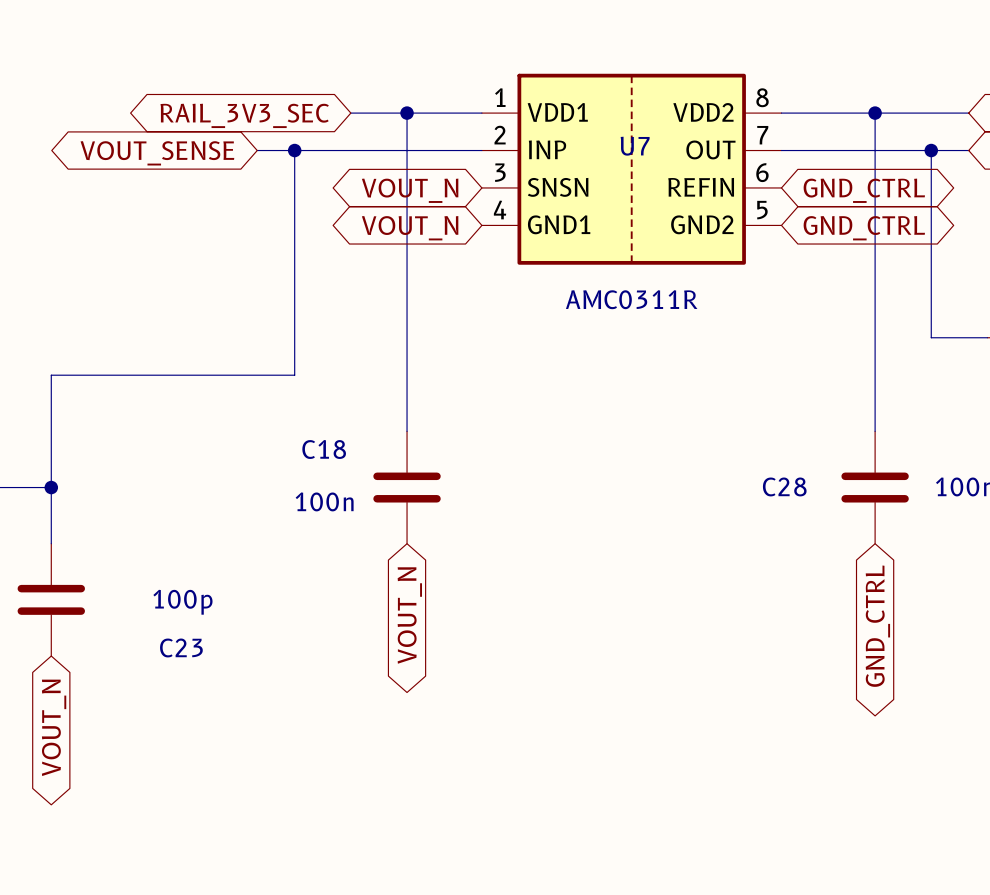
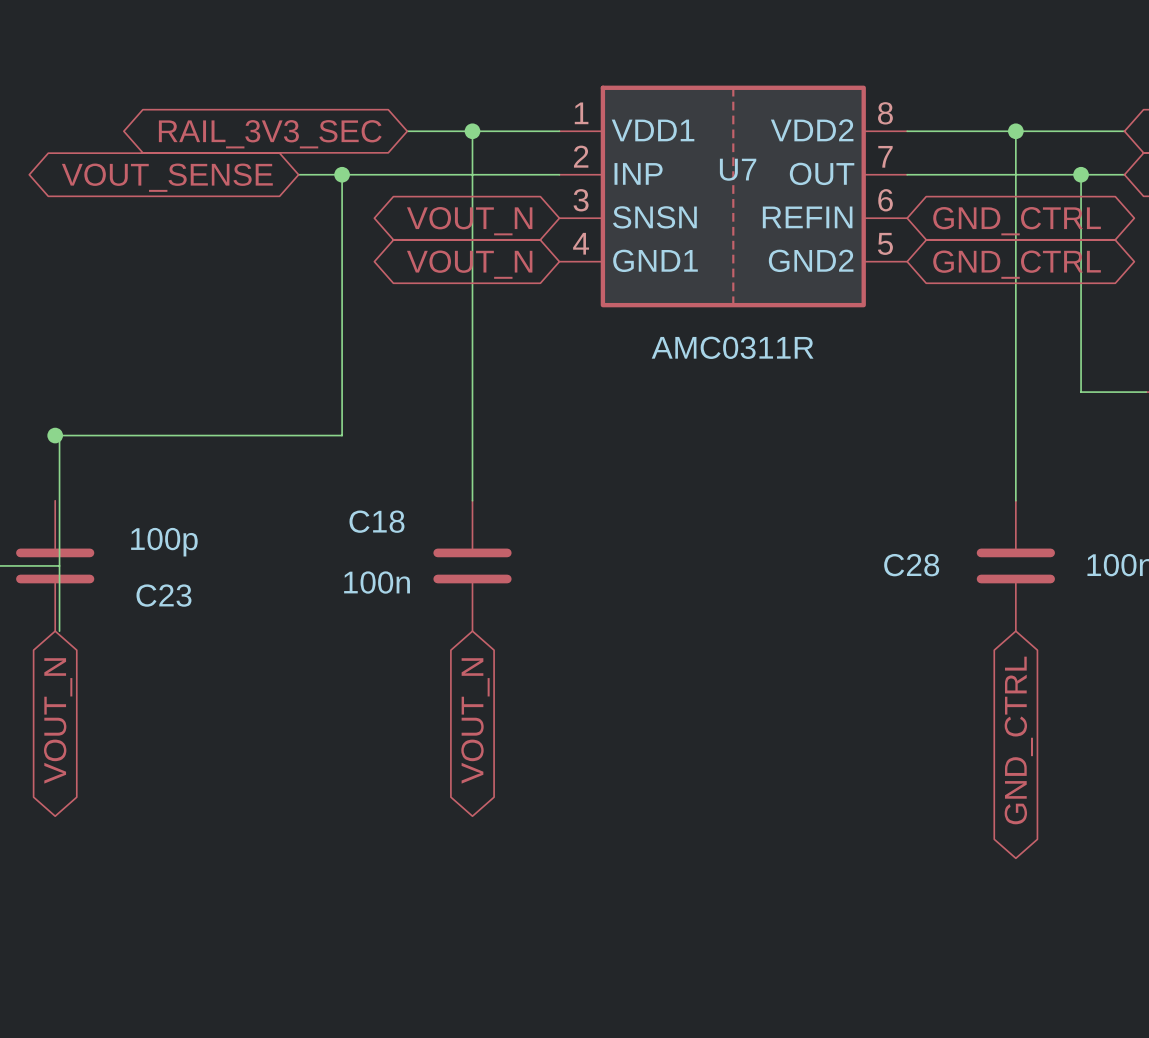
junction: none -> (55, 435)
junction: (51, 487) -> none
C23 position: (51, 599) -> (55, 565)
C23 value position: 100p (182, 602) -> 100p (164, 542)
C23 name position: C23 (181, 647) -> C23 (163, 595)
global label position: VOUT_N (54, 727) -> VOUT_N (58, 720)

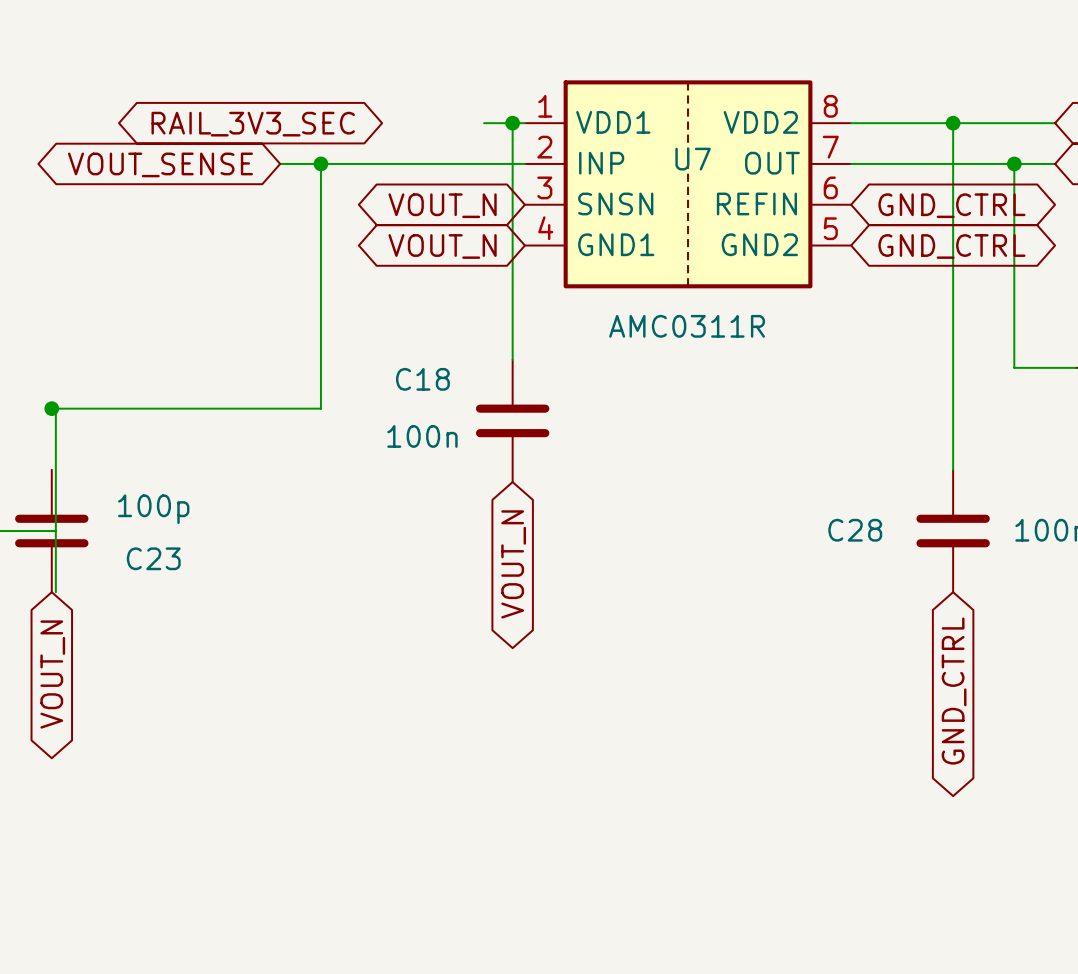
wire: (407, 131) (515, 131) -> none
wire: (472, 131) (472, 500) -> none
junction position: (472, 131) -> (512, 123)
wire: none -> (512, 123) (512, 359)
C18 position: (472, 565) -> (512, 420)
global label position: VOUT_N (475, 720) -> VOUT_N (513, 564)

